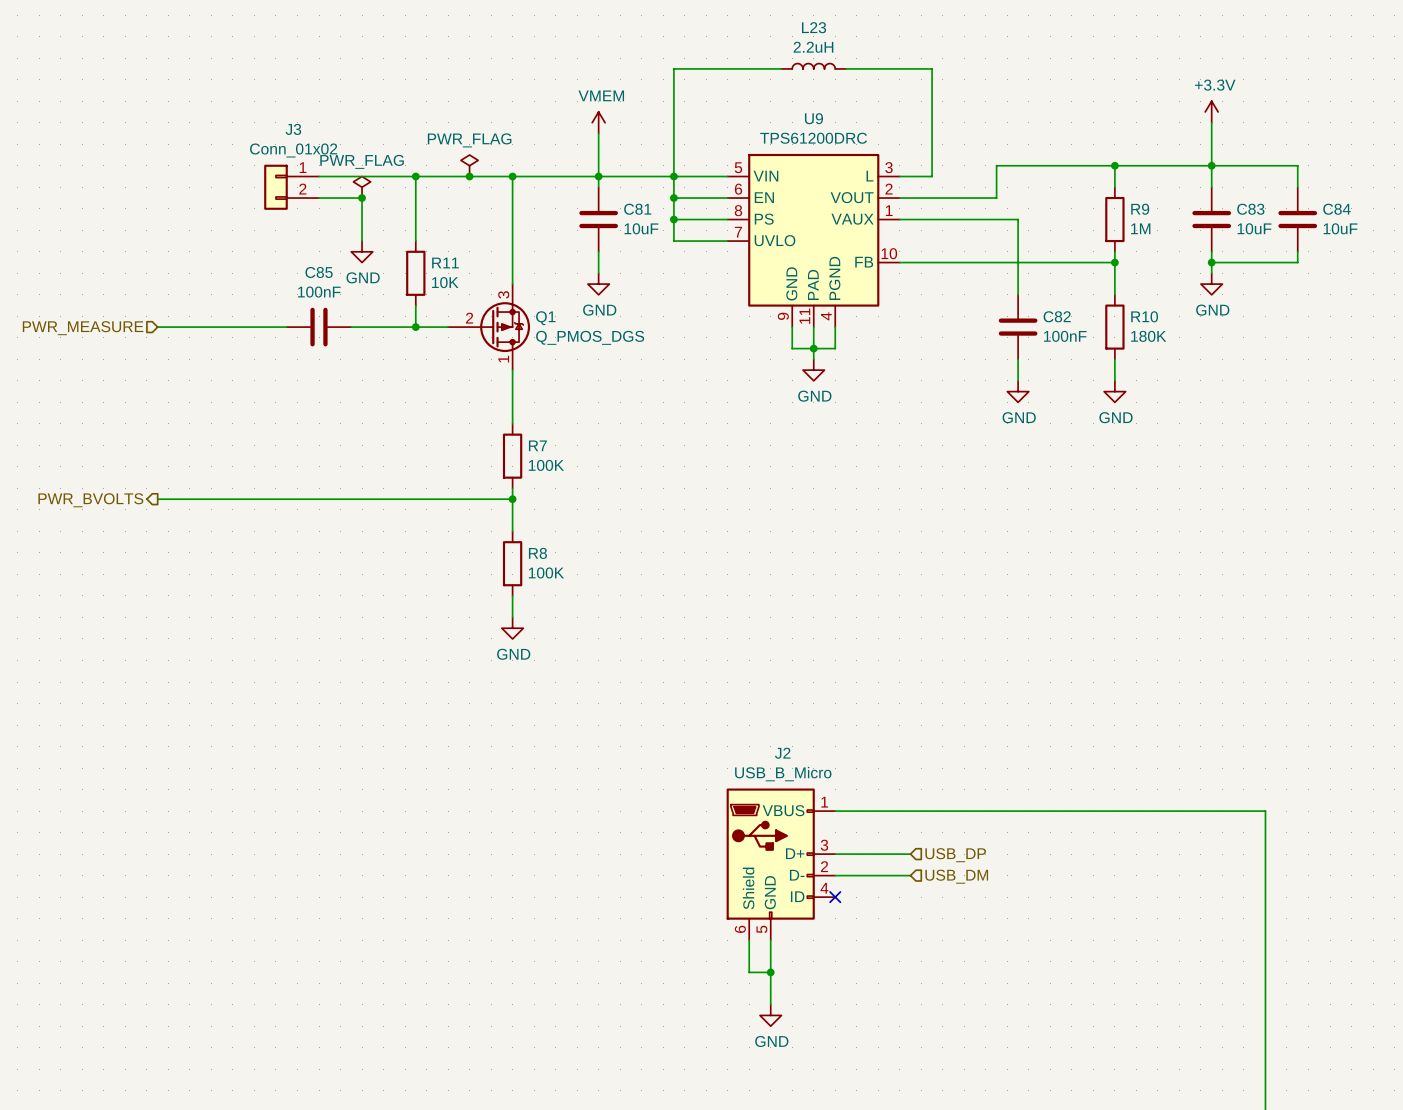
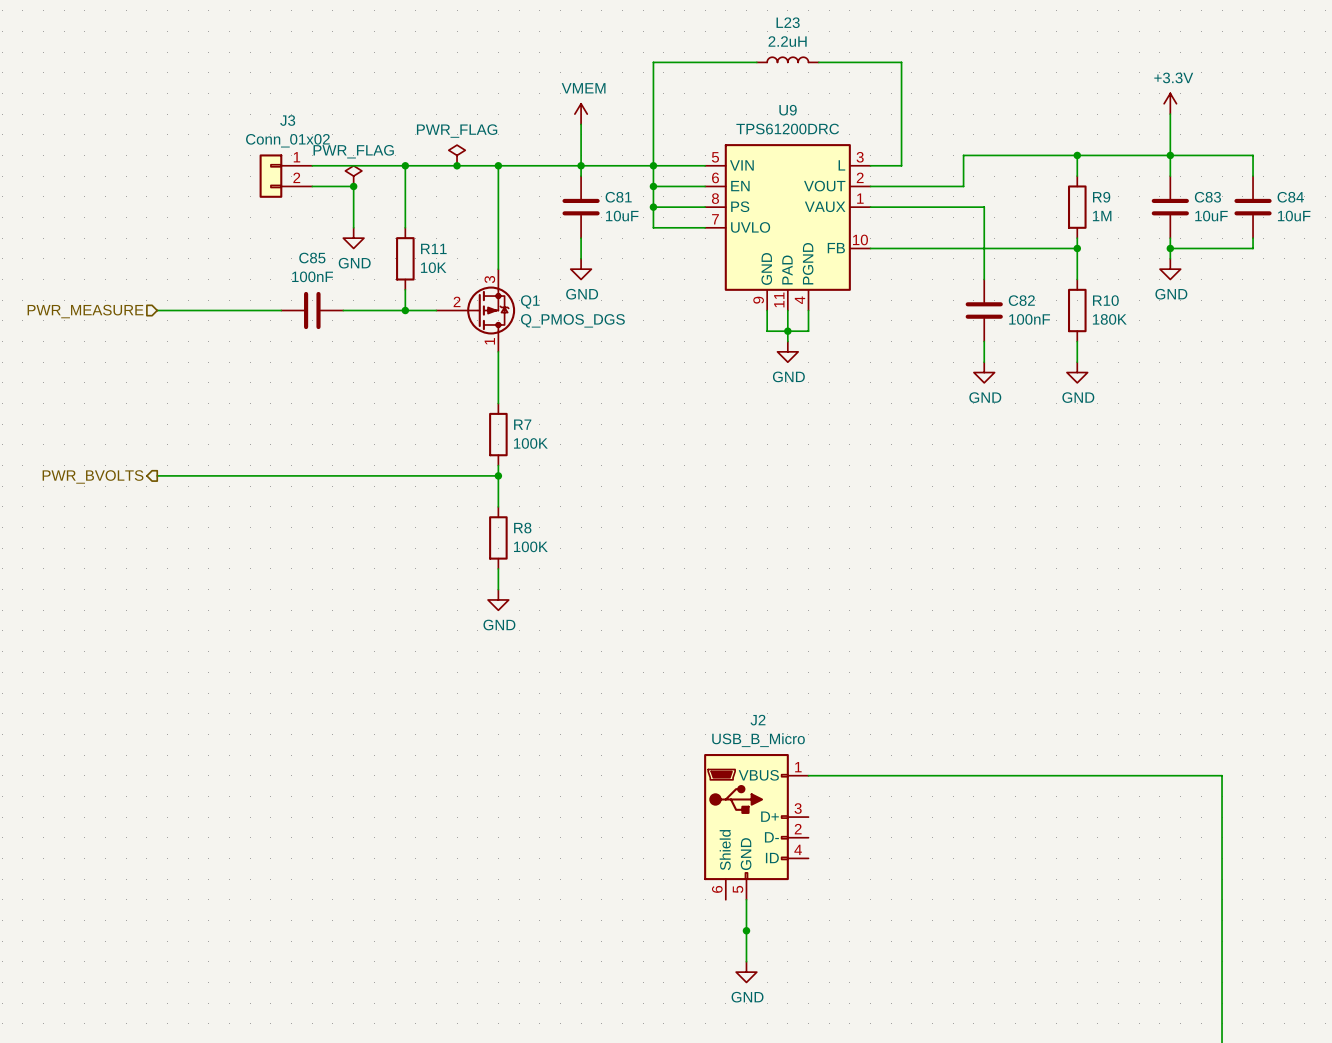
wire: (835, 854) (910, 854) -> none
hierarchical label: USB_DP (955, 855) -> none
wire: (835, 875) (910, 875) -> none
hierarchical label: USB_DM (956, 876) -> none
no-connect mark: (835, 897) -> none
wire: (749, 940) (749, 972) (770, 972) -> none

